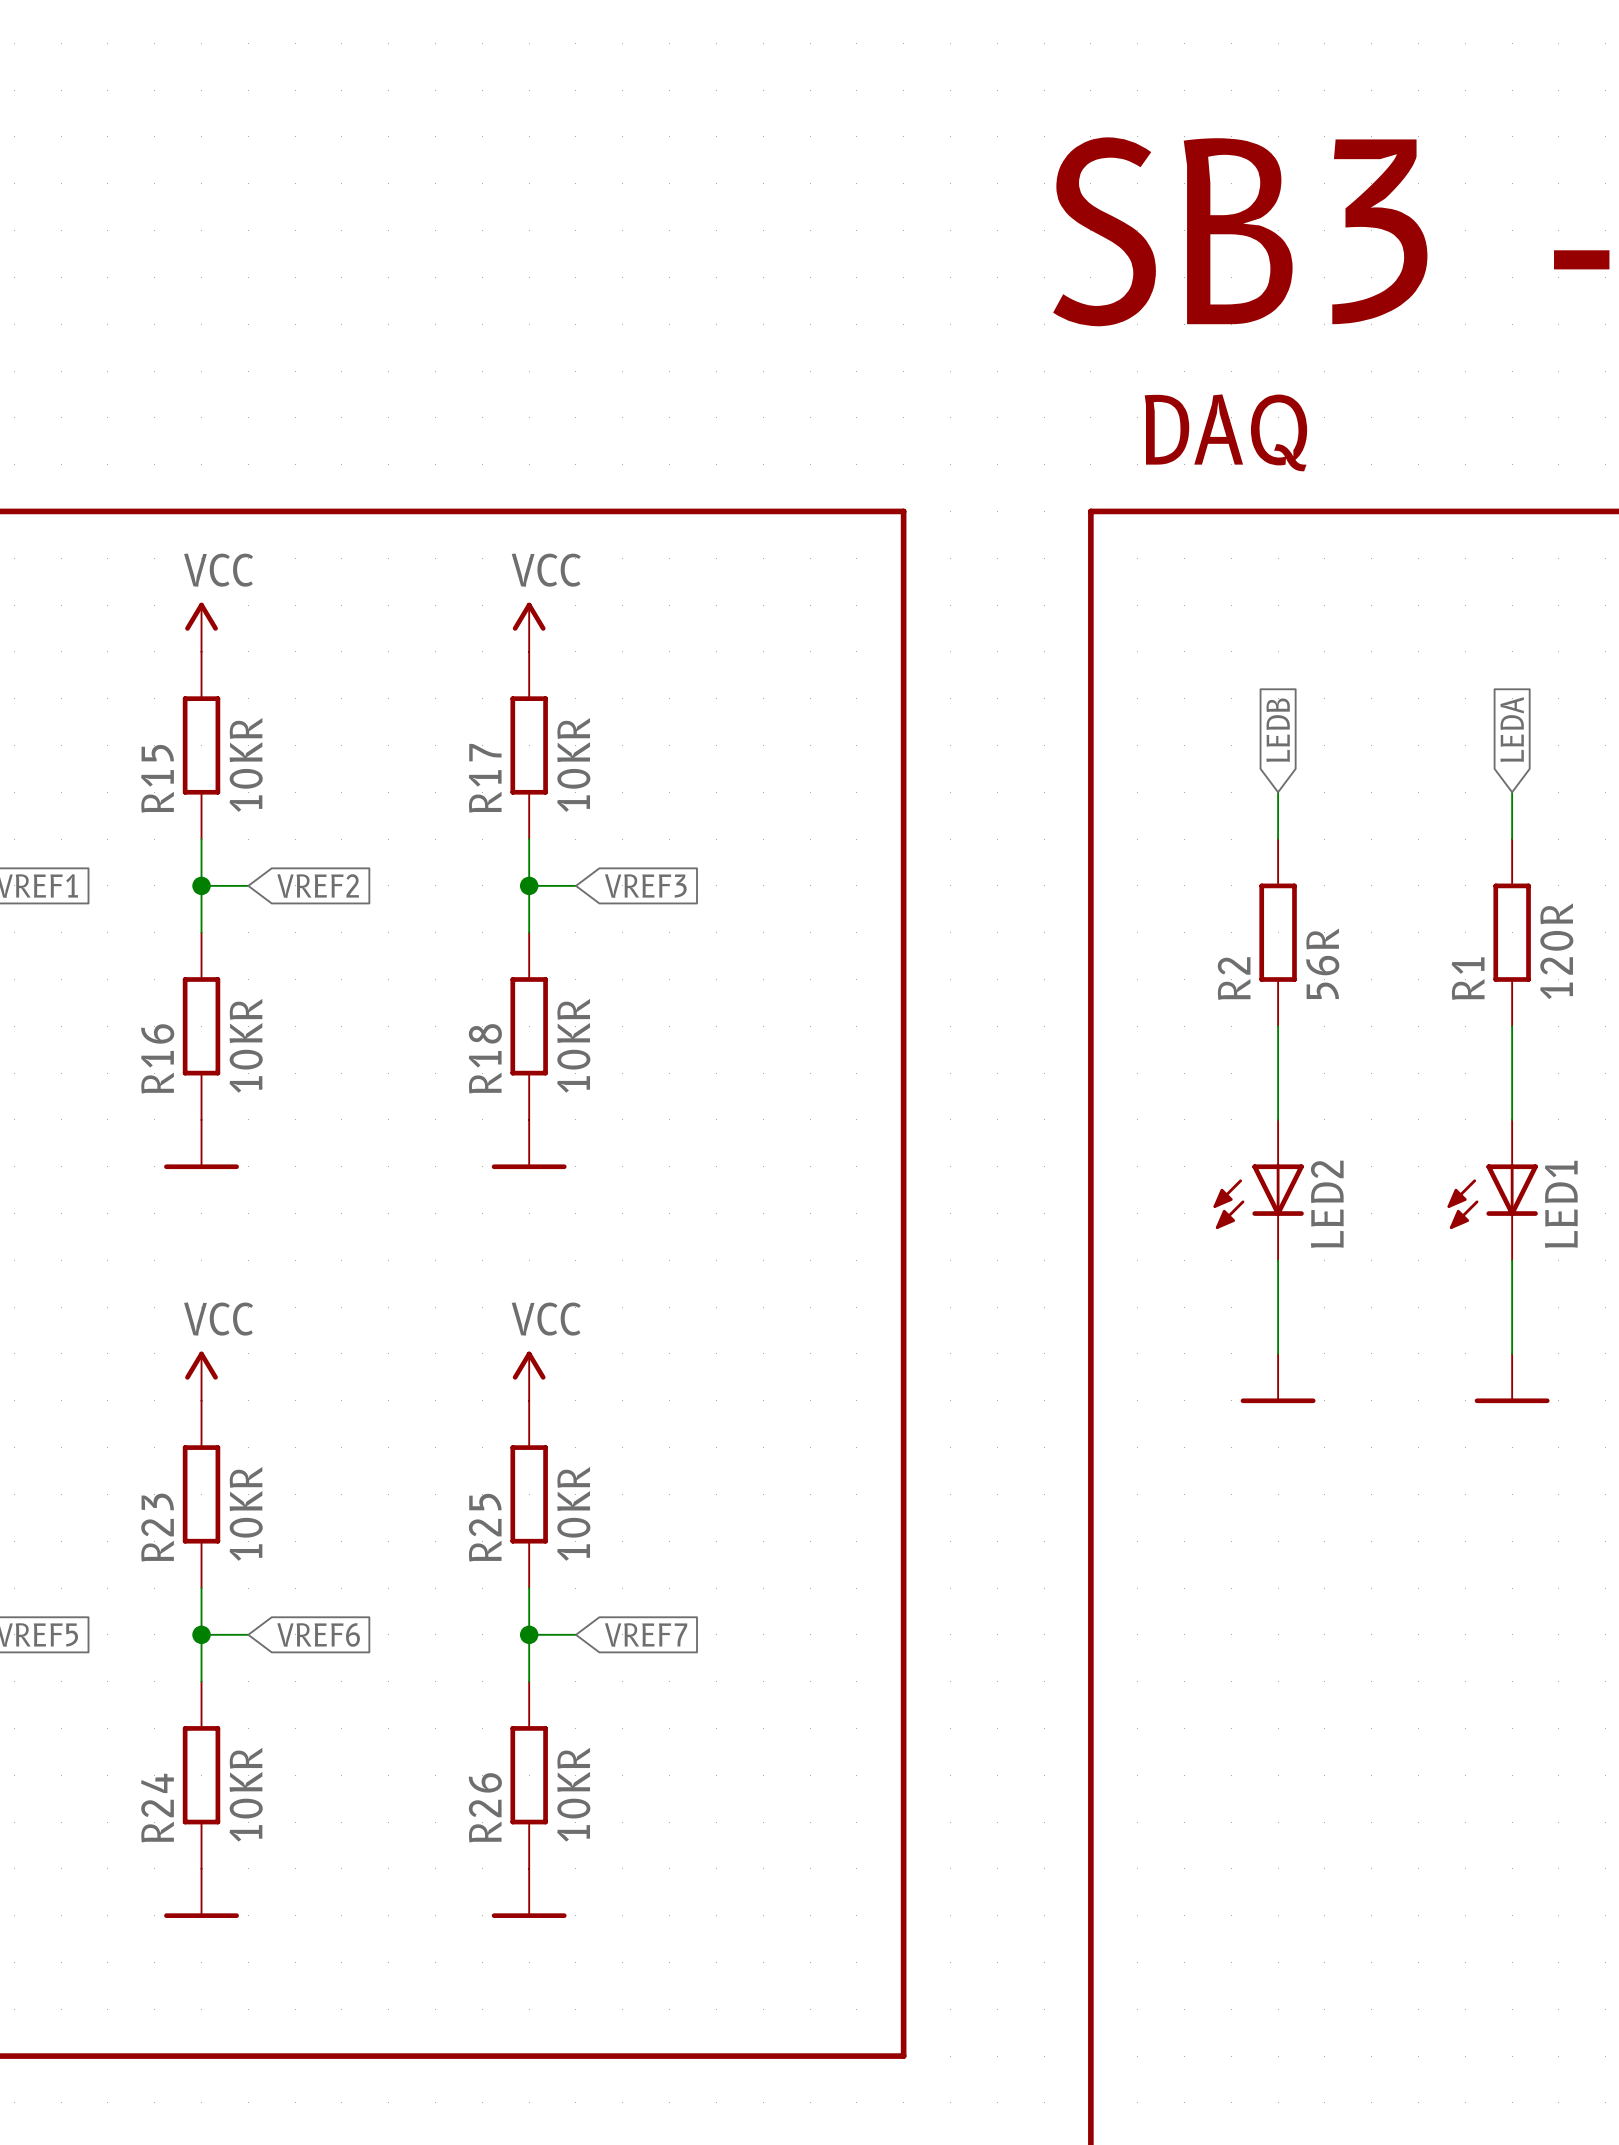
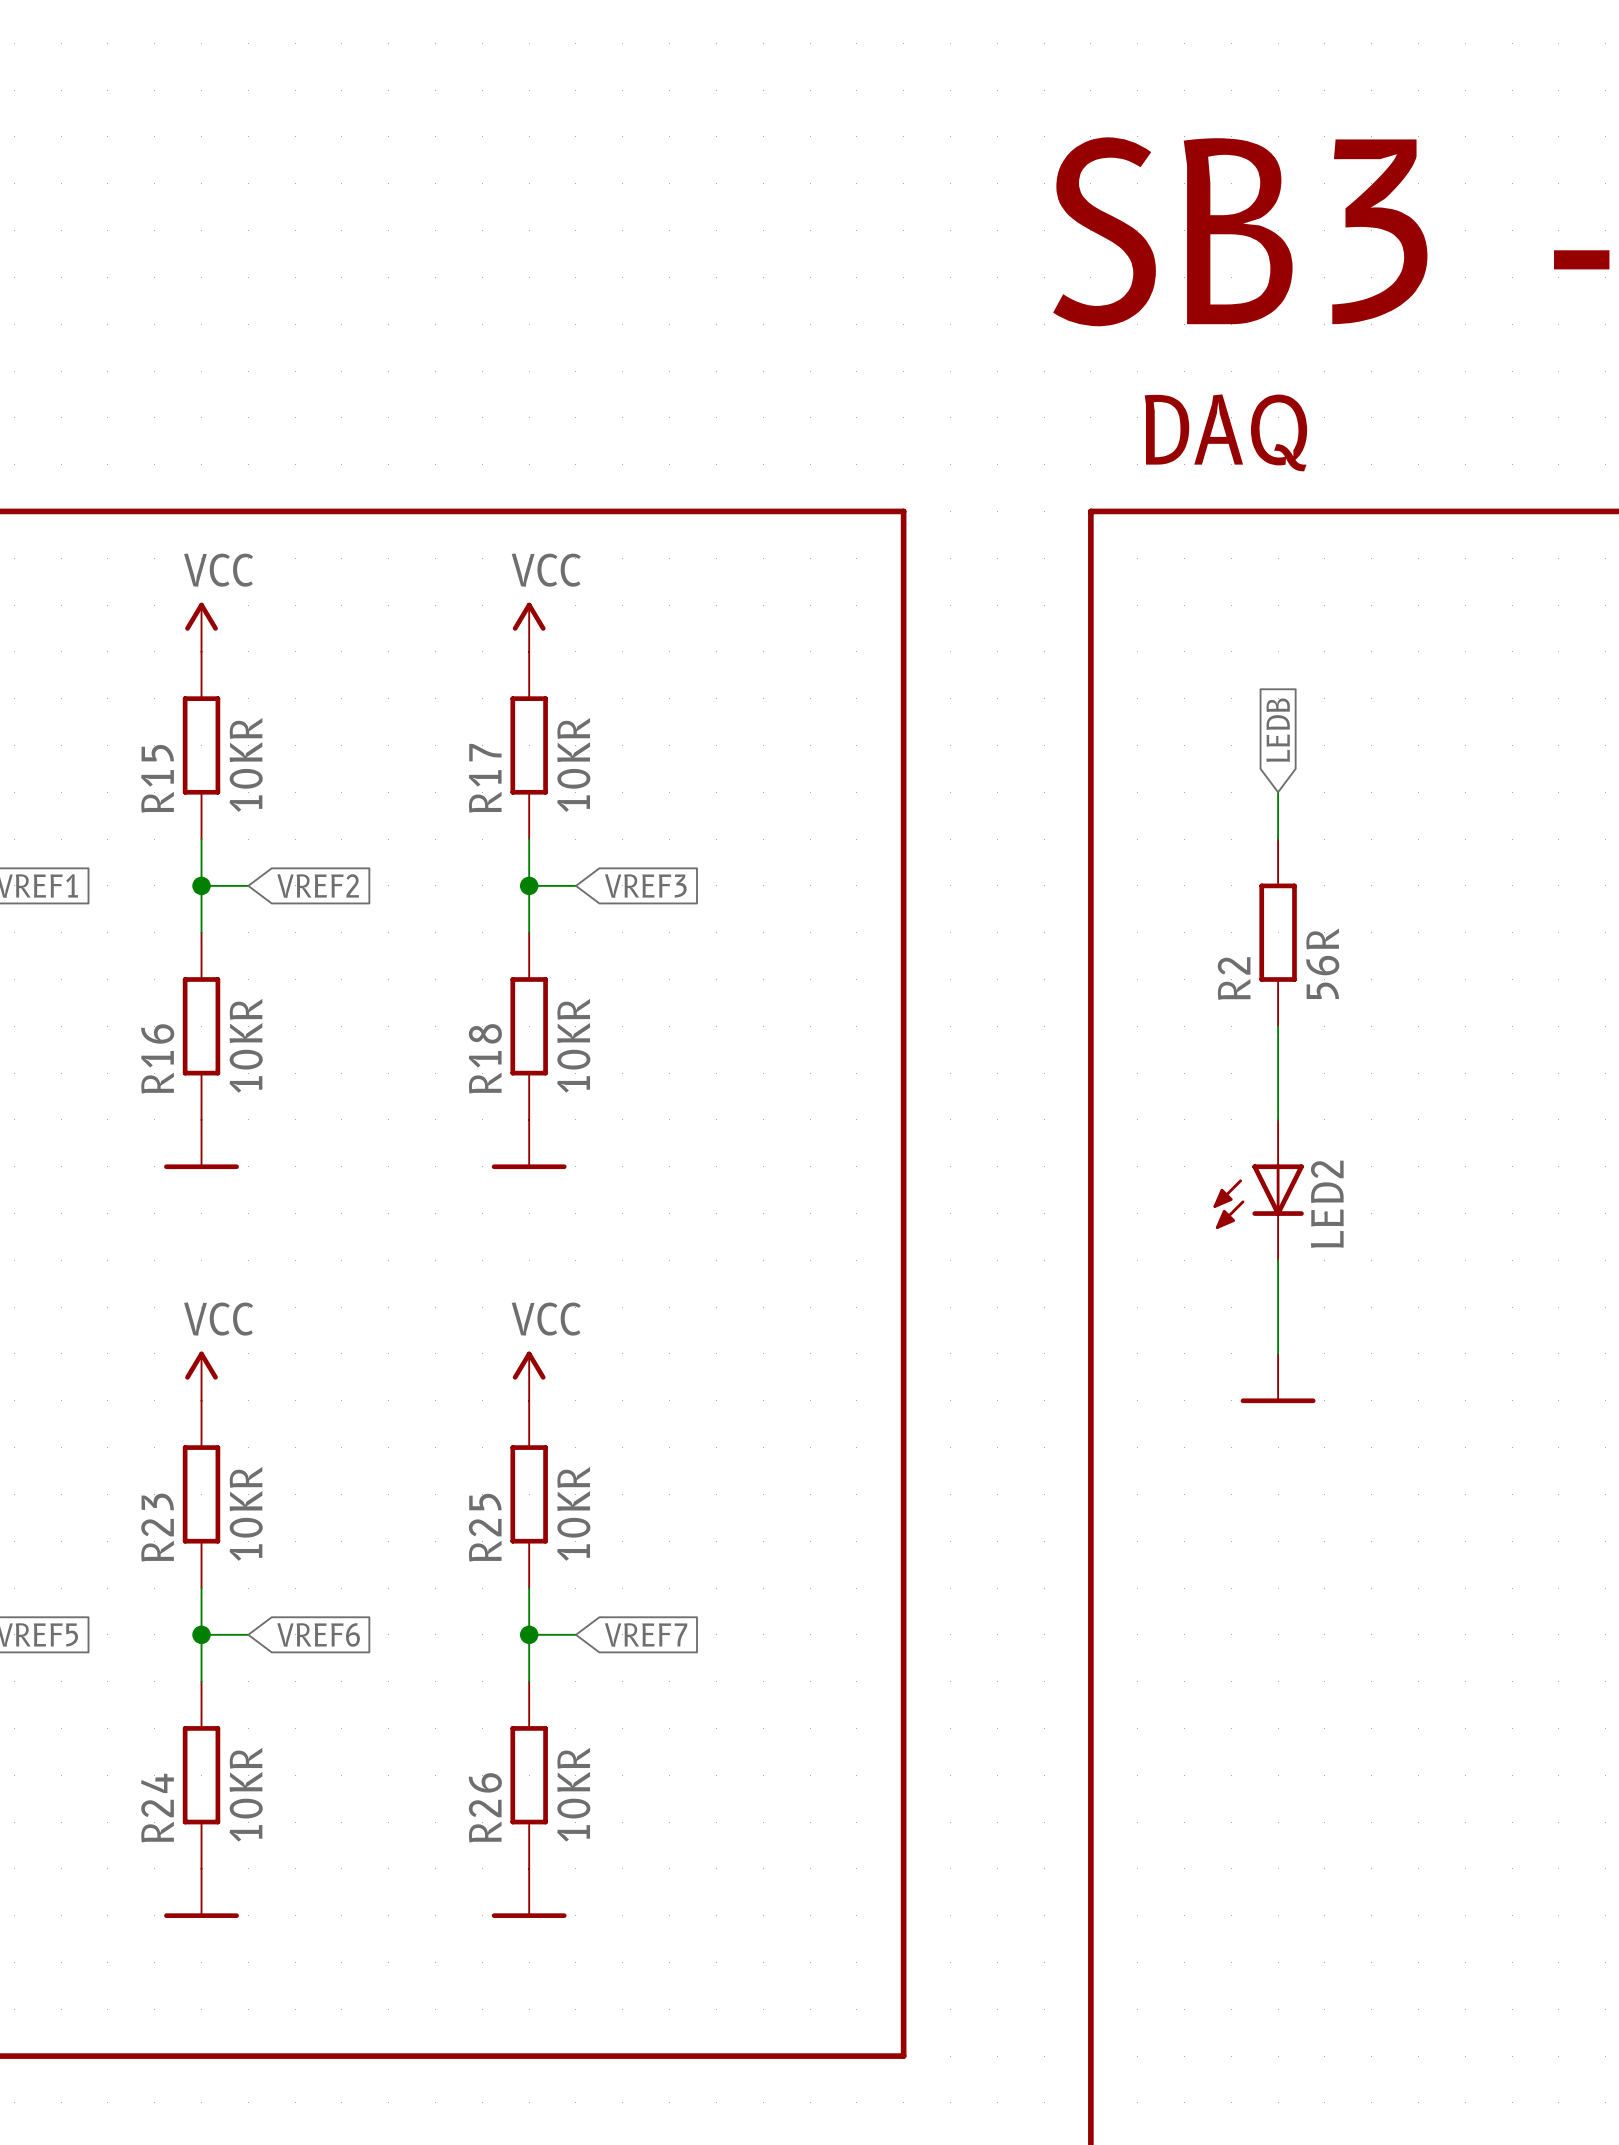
global label: LEDA (1512, 729) -> none
wire: (1512, 792) (1512, 839) -> none
R1: 120R (1512, 932) -> none
wire: (1512, 1026) (1512, 1119) -> none
LED1: (1492, 1190) -> none
wire: (1512, 1260) (1512, 1353) -> none
power symbol: (1512, 1378) -> none

